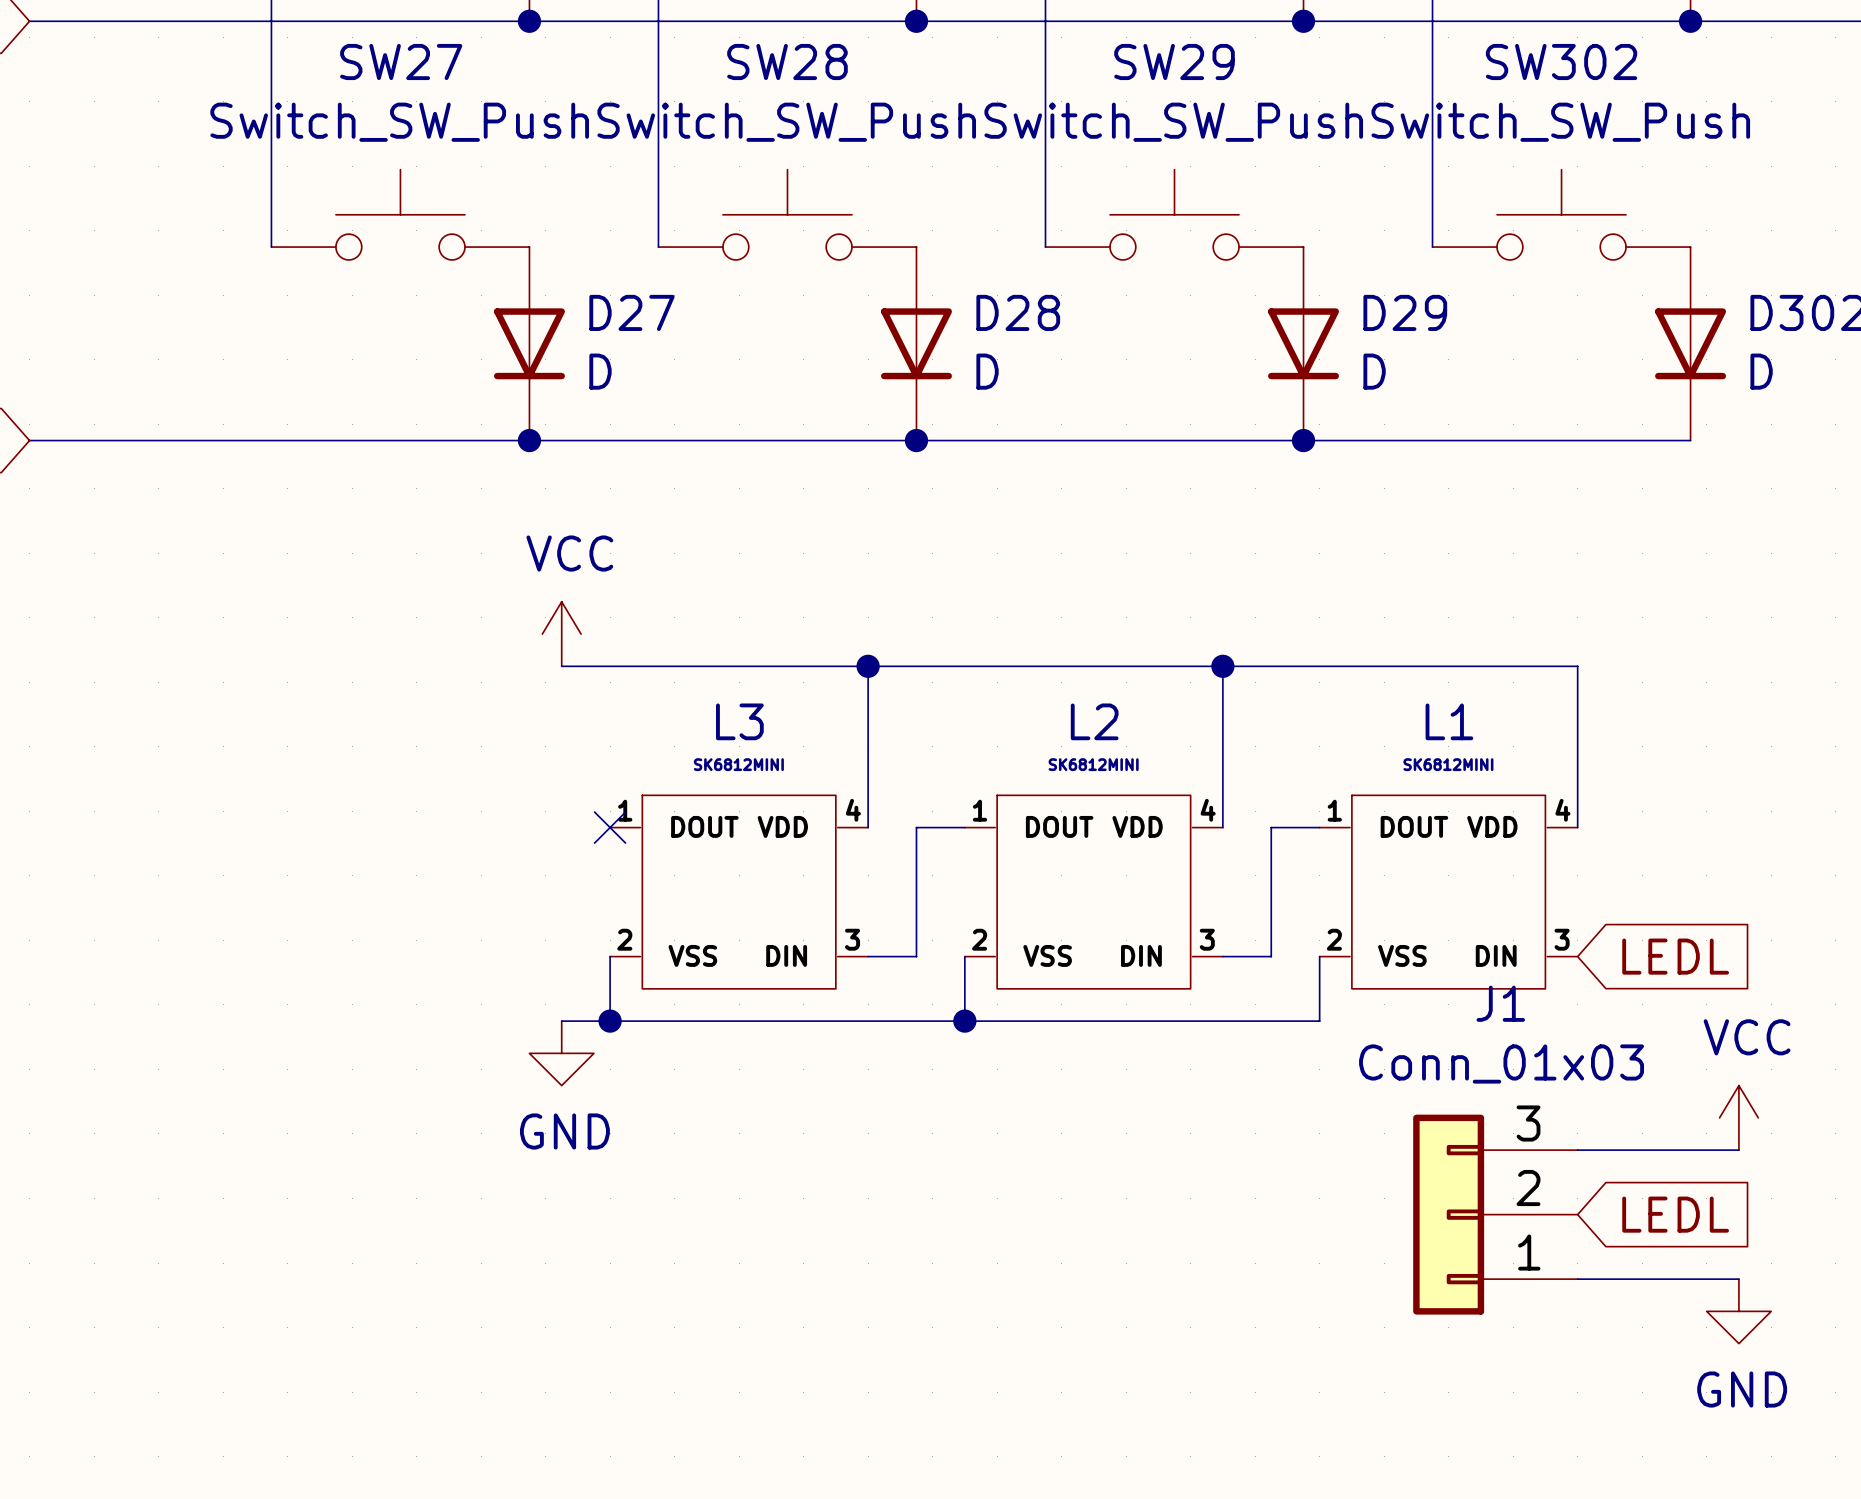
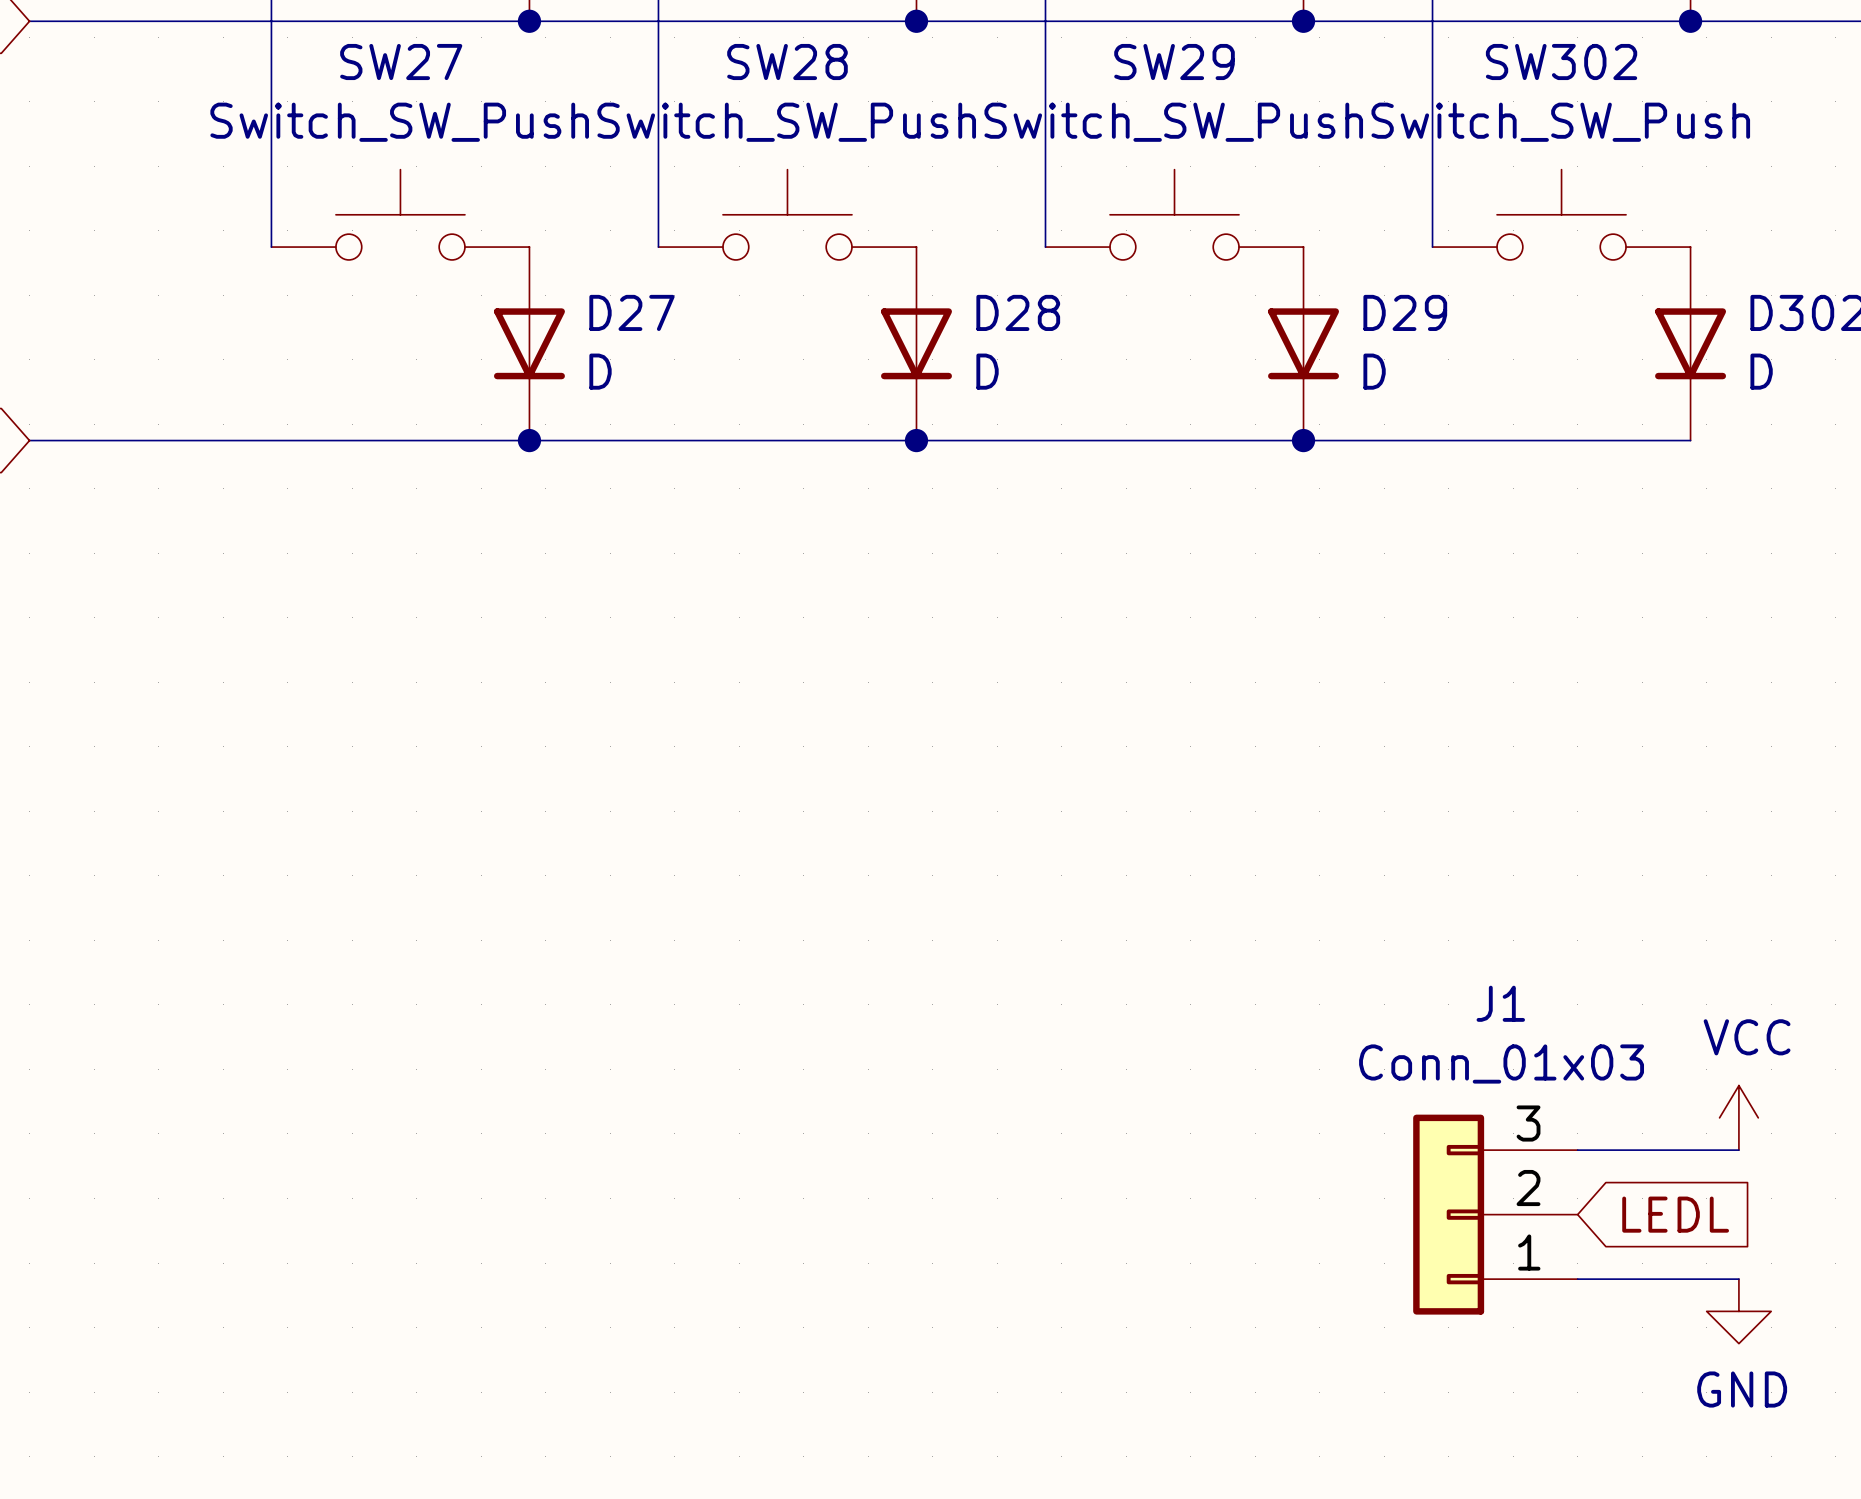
power symbol: VCC (561, 634) -> none
wire: (561, 666) (1577, 666) (1577, 827) -> none
wire: (868, 666) (868, 827) -> none
junction: (868, 666) -> none
wire: (1222, 666) (1222, 827) -> none
junction: (1222, 666) -> none
no-connect mark: (610, 827) -> none
wire: (964, 827) (916, 827) (916, 956) (868, 956) -> none
wire: (1319, 827) (1271, 827) (1271, 956) (1222, 956) -> none
L3: SK6812MINI (739, 892) -> none
L2: SK6812MINI (1093, 892) -> none
L1: SK6812MINI (1448, 892) -> none
wire: (610, 956) (610, 1021) -> none
wire: (964, 956) (964, 1021) -> none
wire: (1319, 956) (1319, 1021) (561, 1021) -> none
global label: LEDL (1675, 956) -> none
junction: (610, 1021) -> none
junction: (964, 1021) -> none
power symbol: GND (561, 1053) -> none

